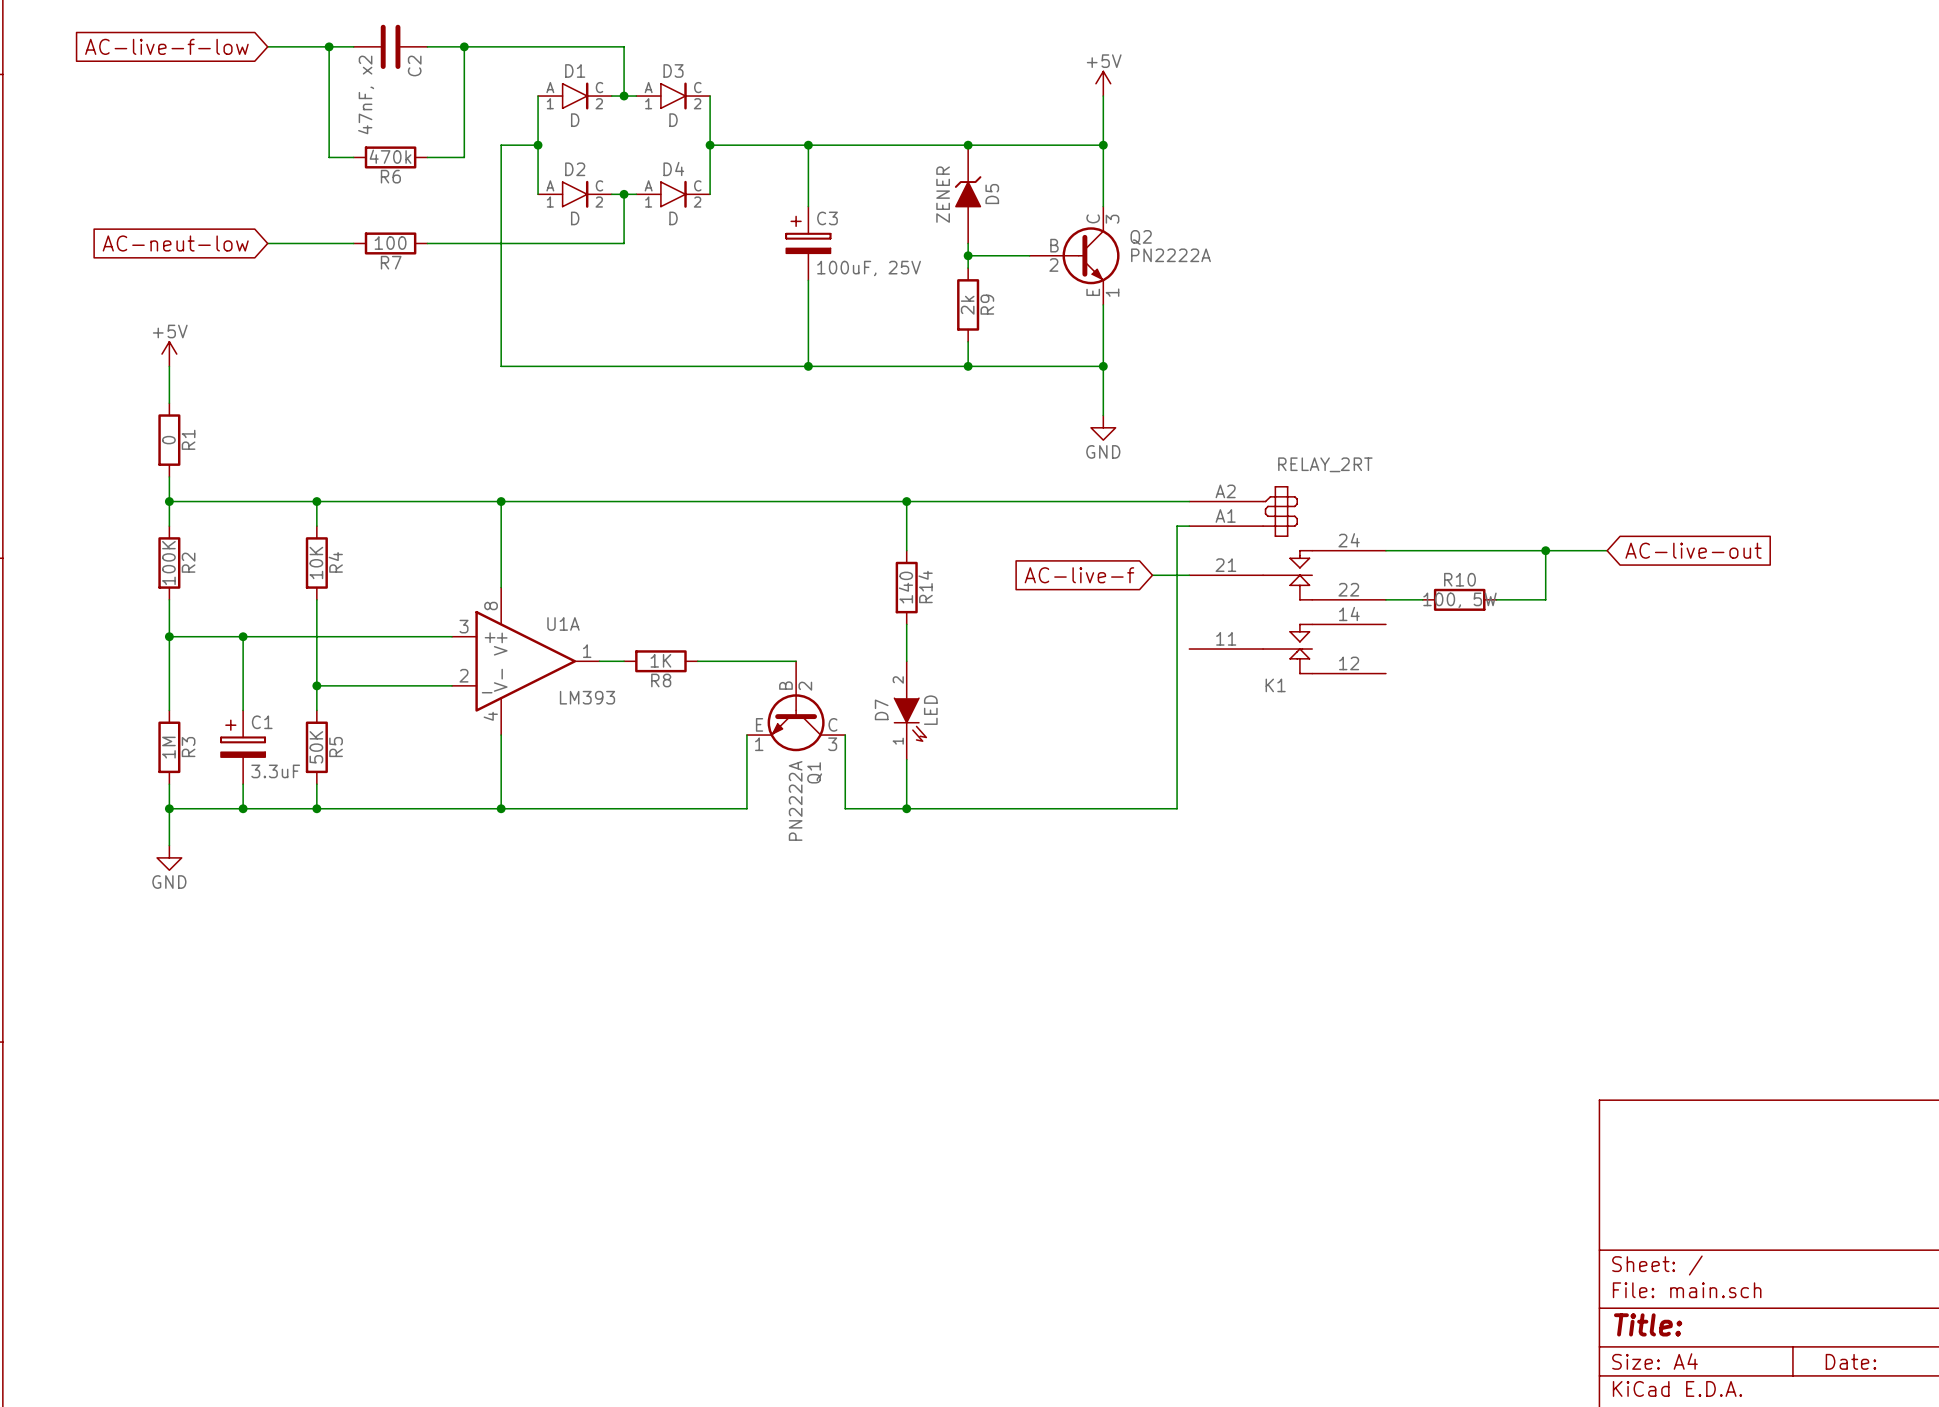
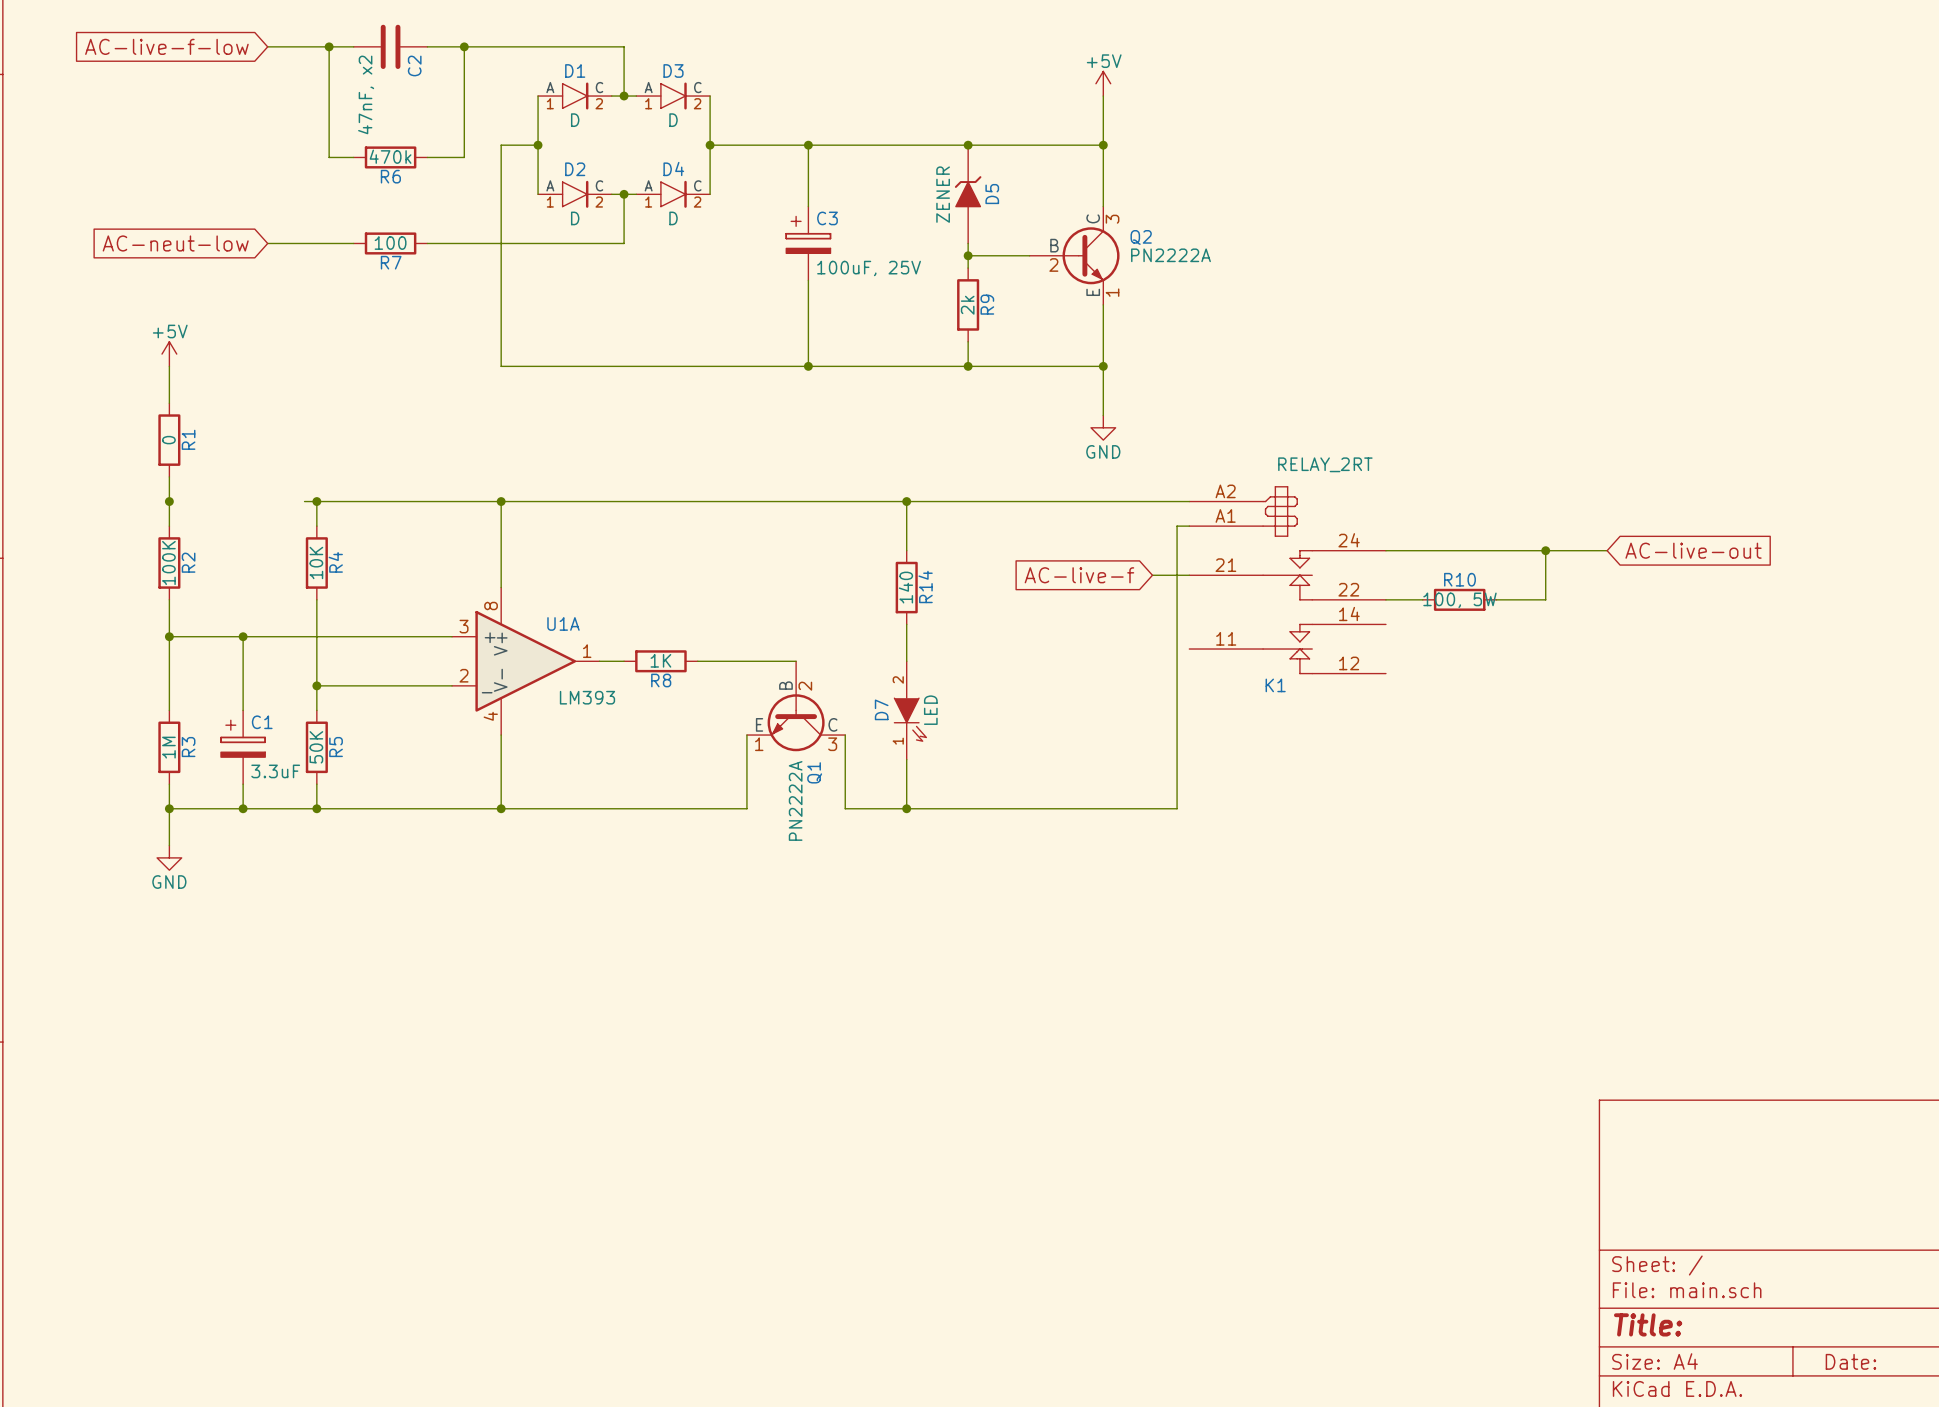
wire: (169, 501) (304, 501) -> none

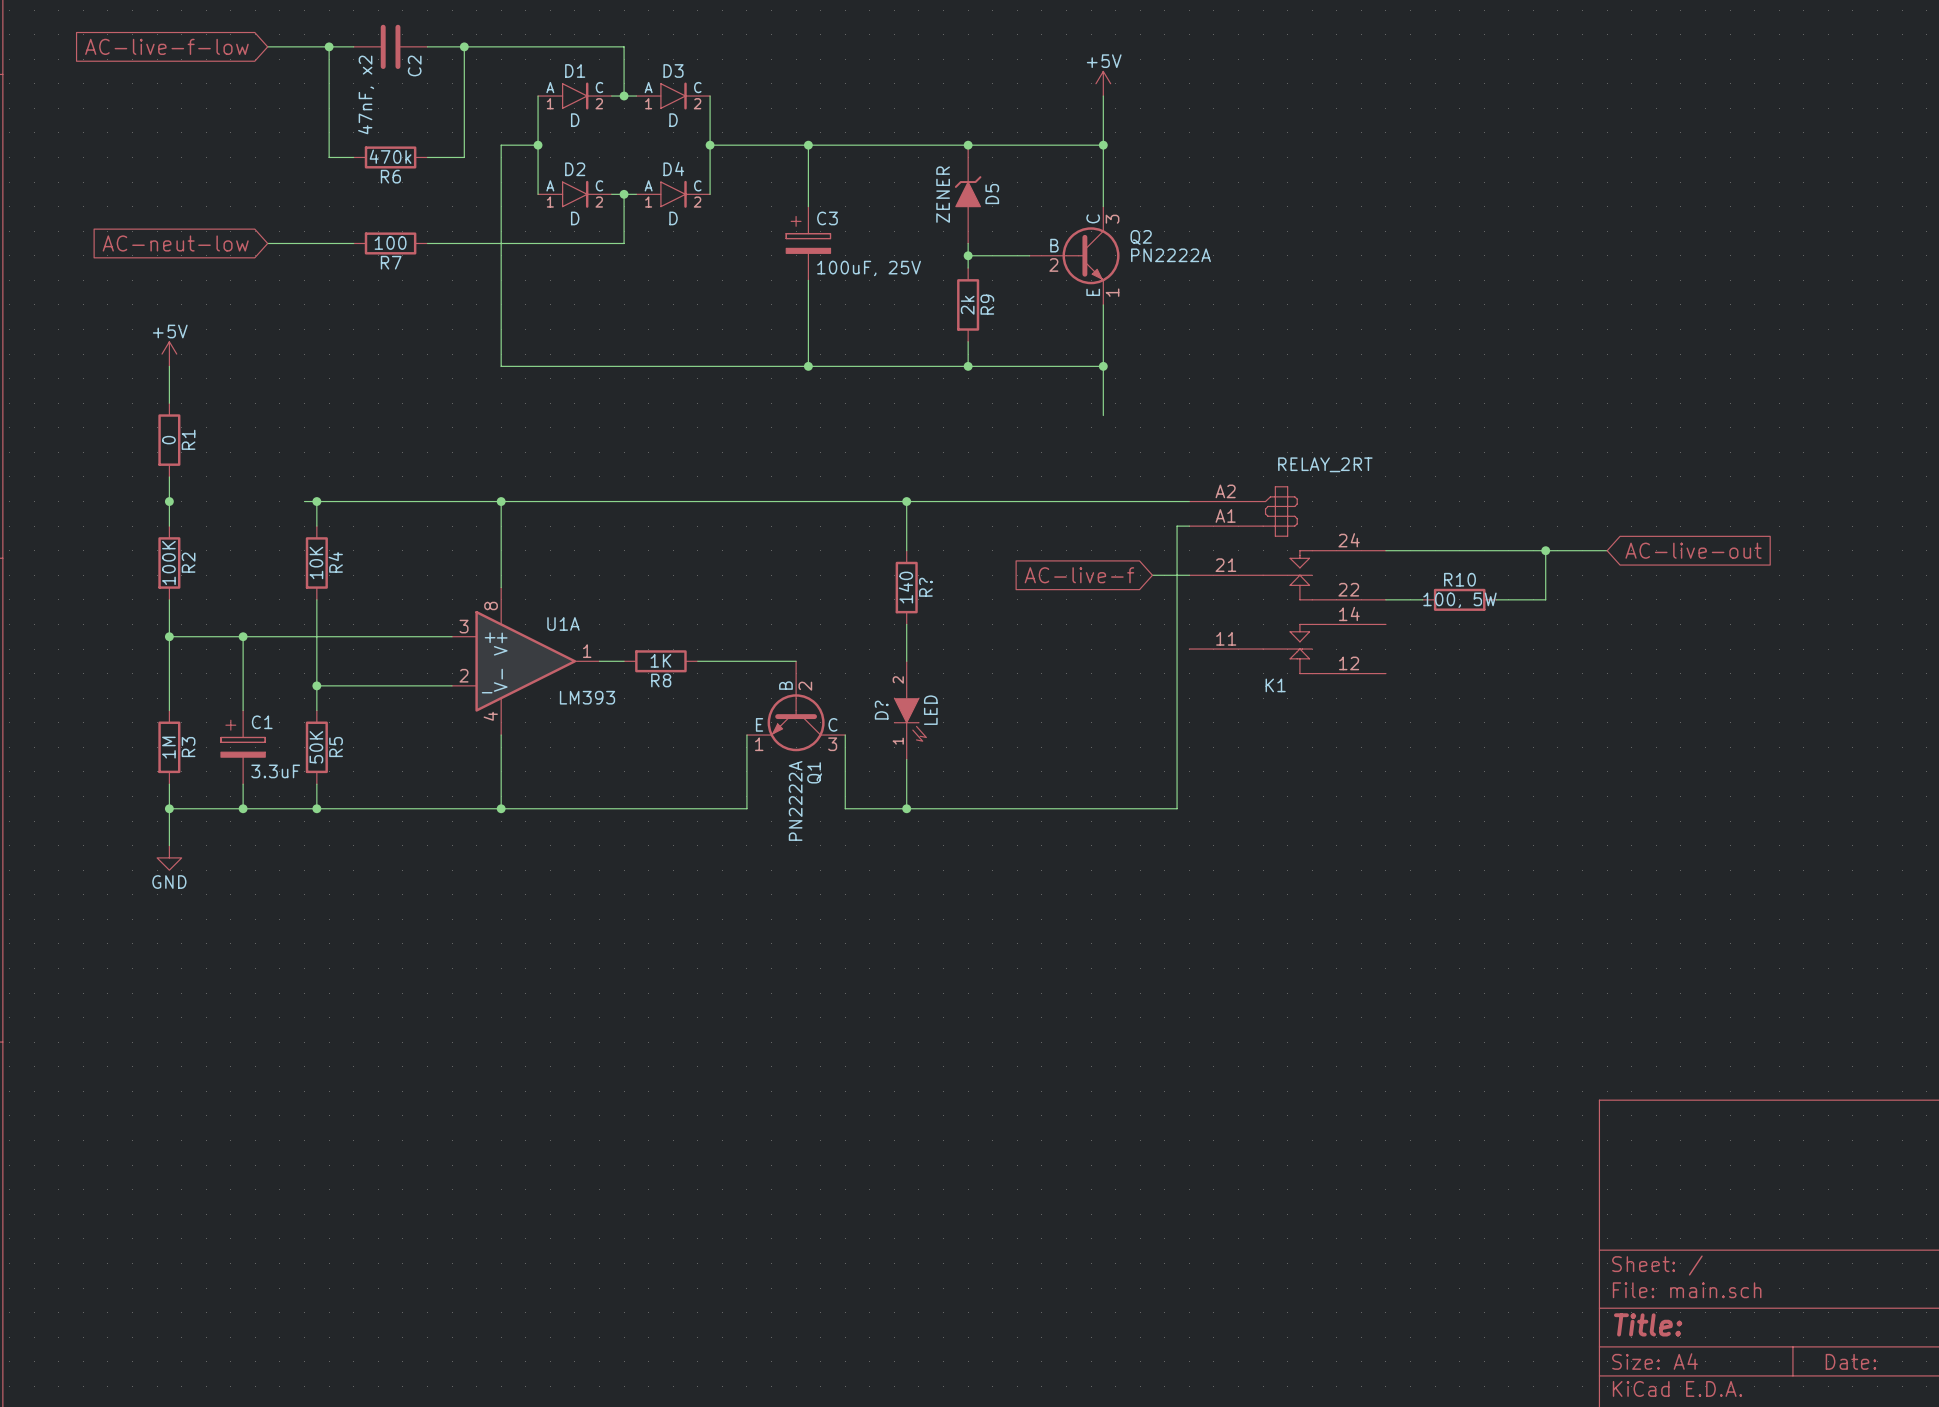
power symbol: GND (1103, 427) -> none
R14 name: R14 (925, 586) -> R? (925, 587)
D7 name: D7 (881, 709) -> D? (881, 710)

